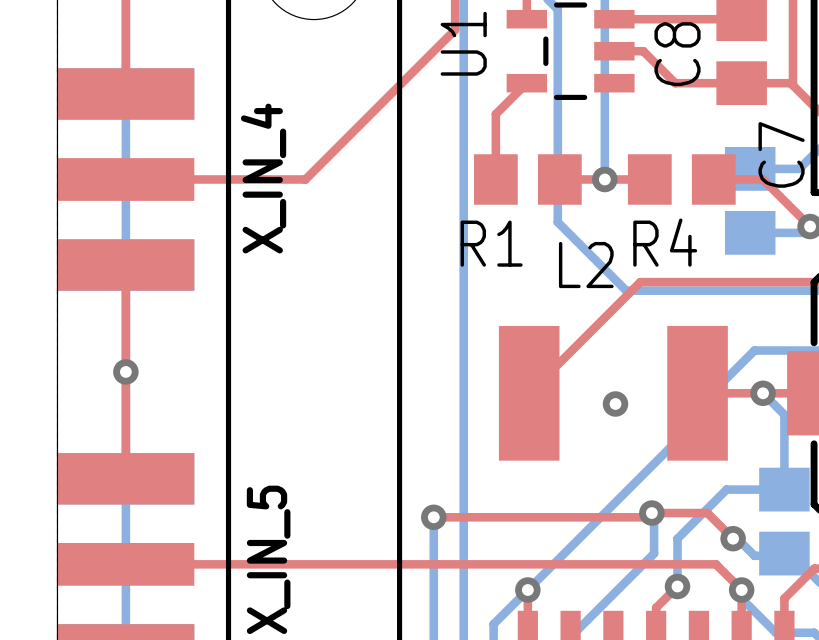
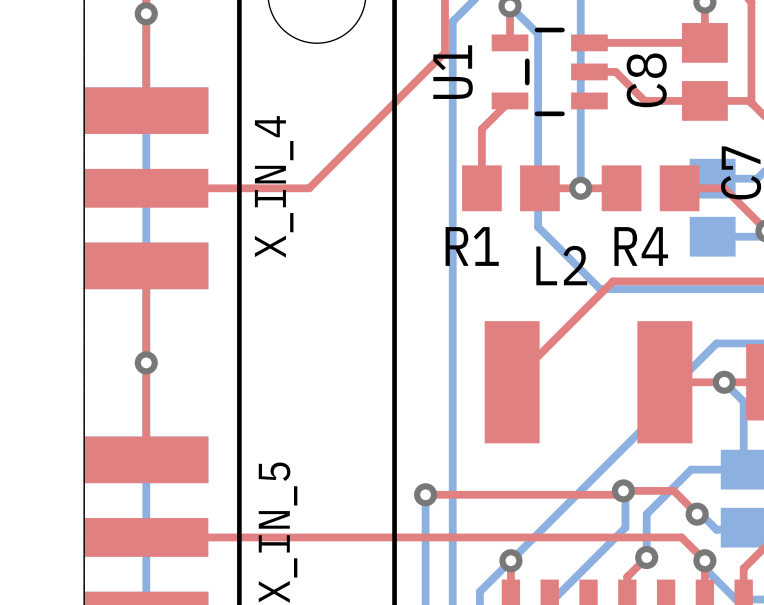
via: (615, 403) -> none

